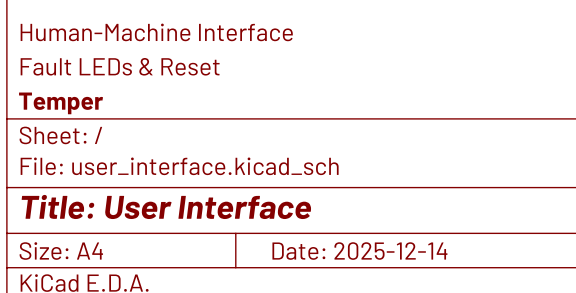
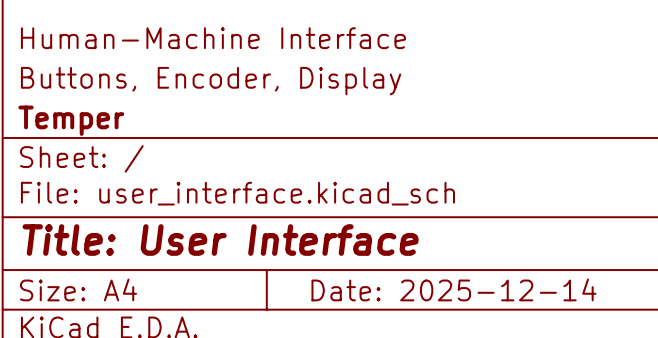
title block: Fault LEDs & Reset (120, 66) -> Buttons, Encoder, Display (211, 81)

